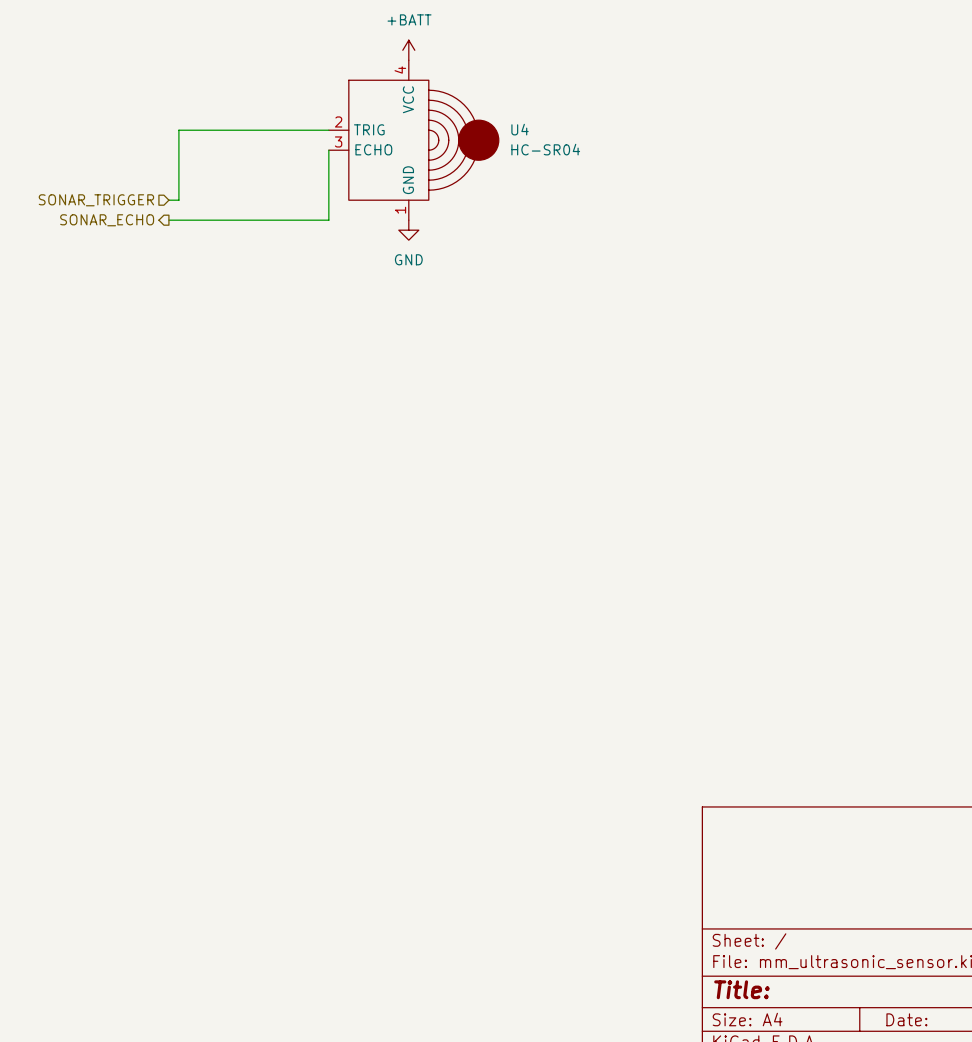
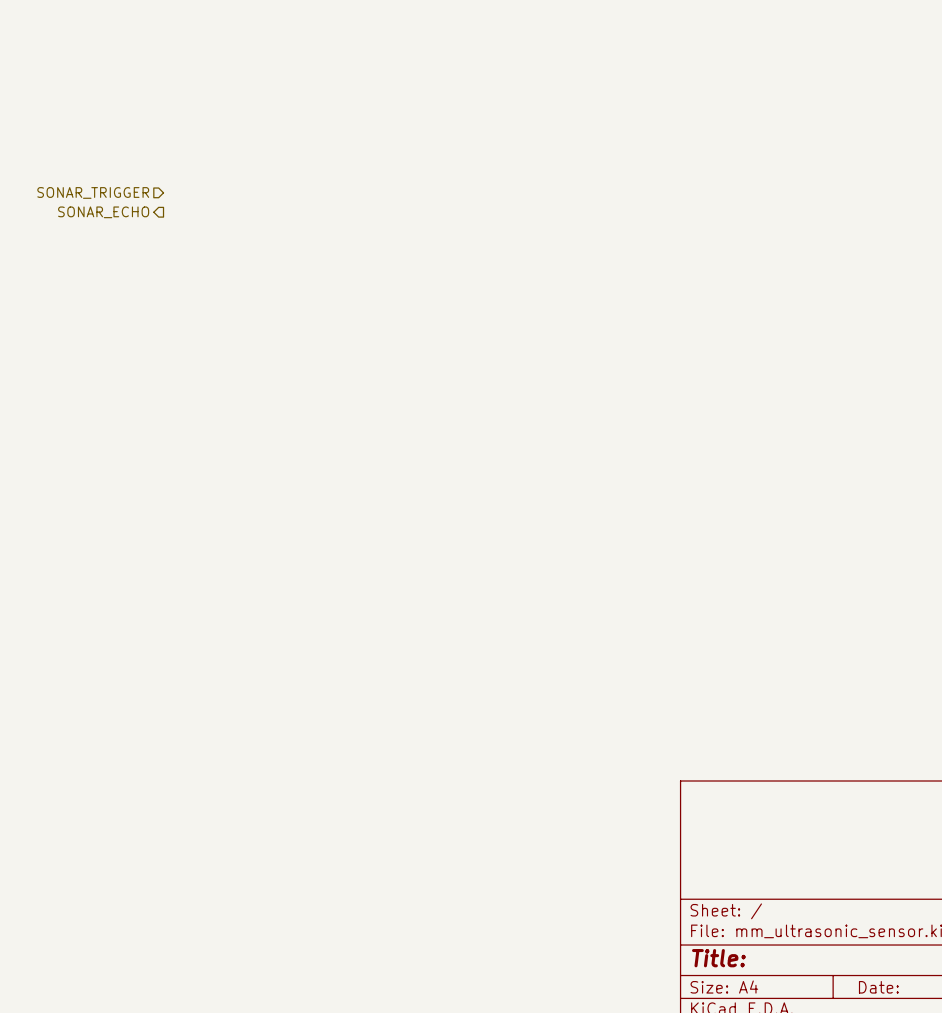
power symbol: +BATT (408, 50) -> none
wire: (328, 130) (178, 130) (178, 200) (168, 200) -> none
U4: HC-SR04 (413, 140) -> none
wire: (328, 150) (328, 220) (168, 220) -> none
power symbol: GND (408, 230) -> none

